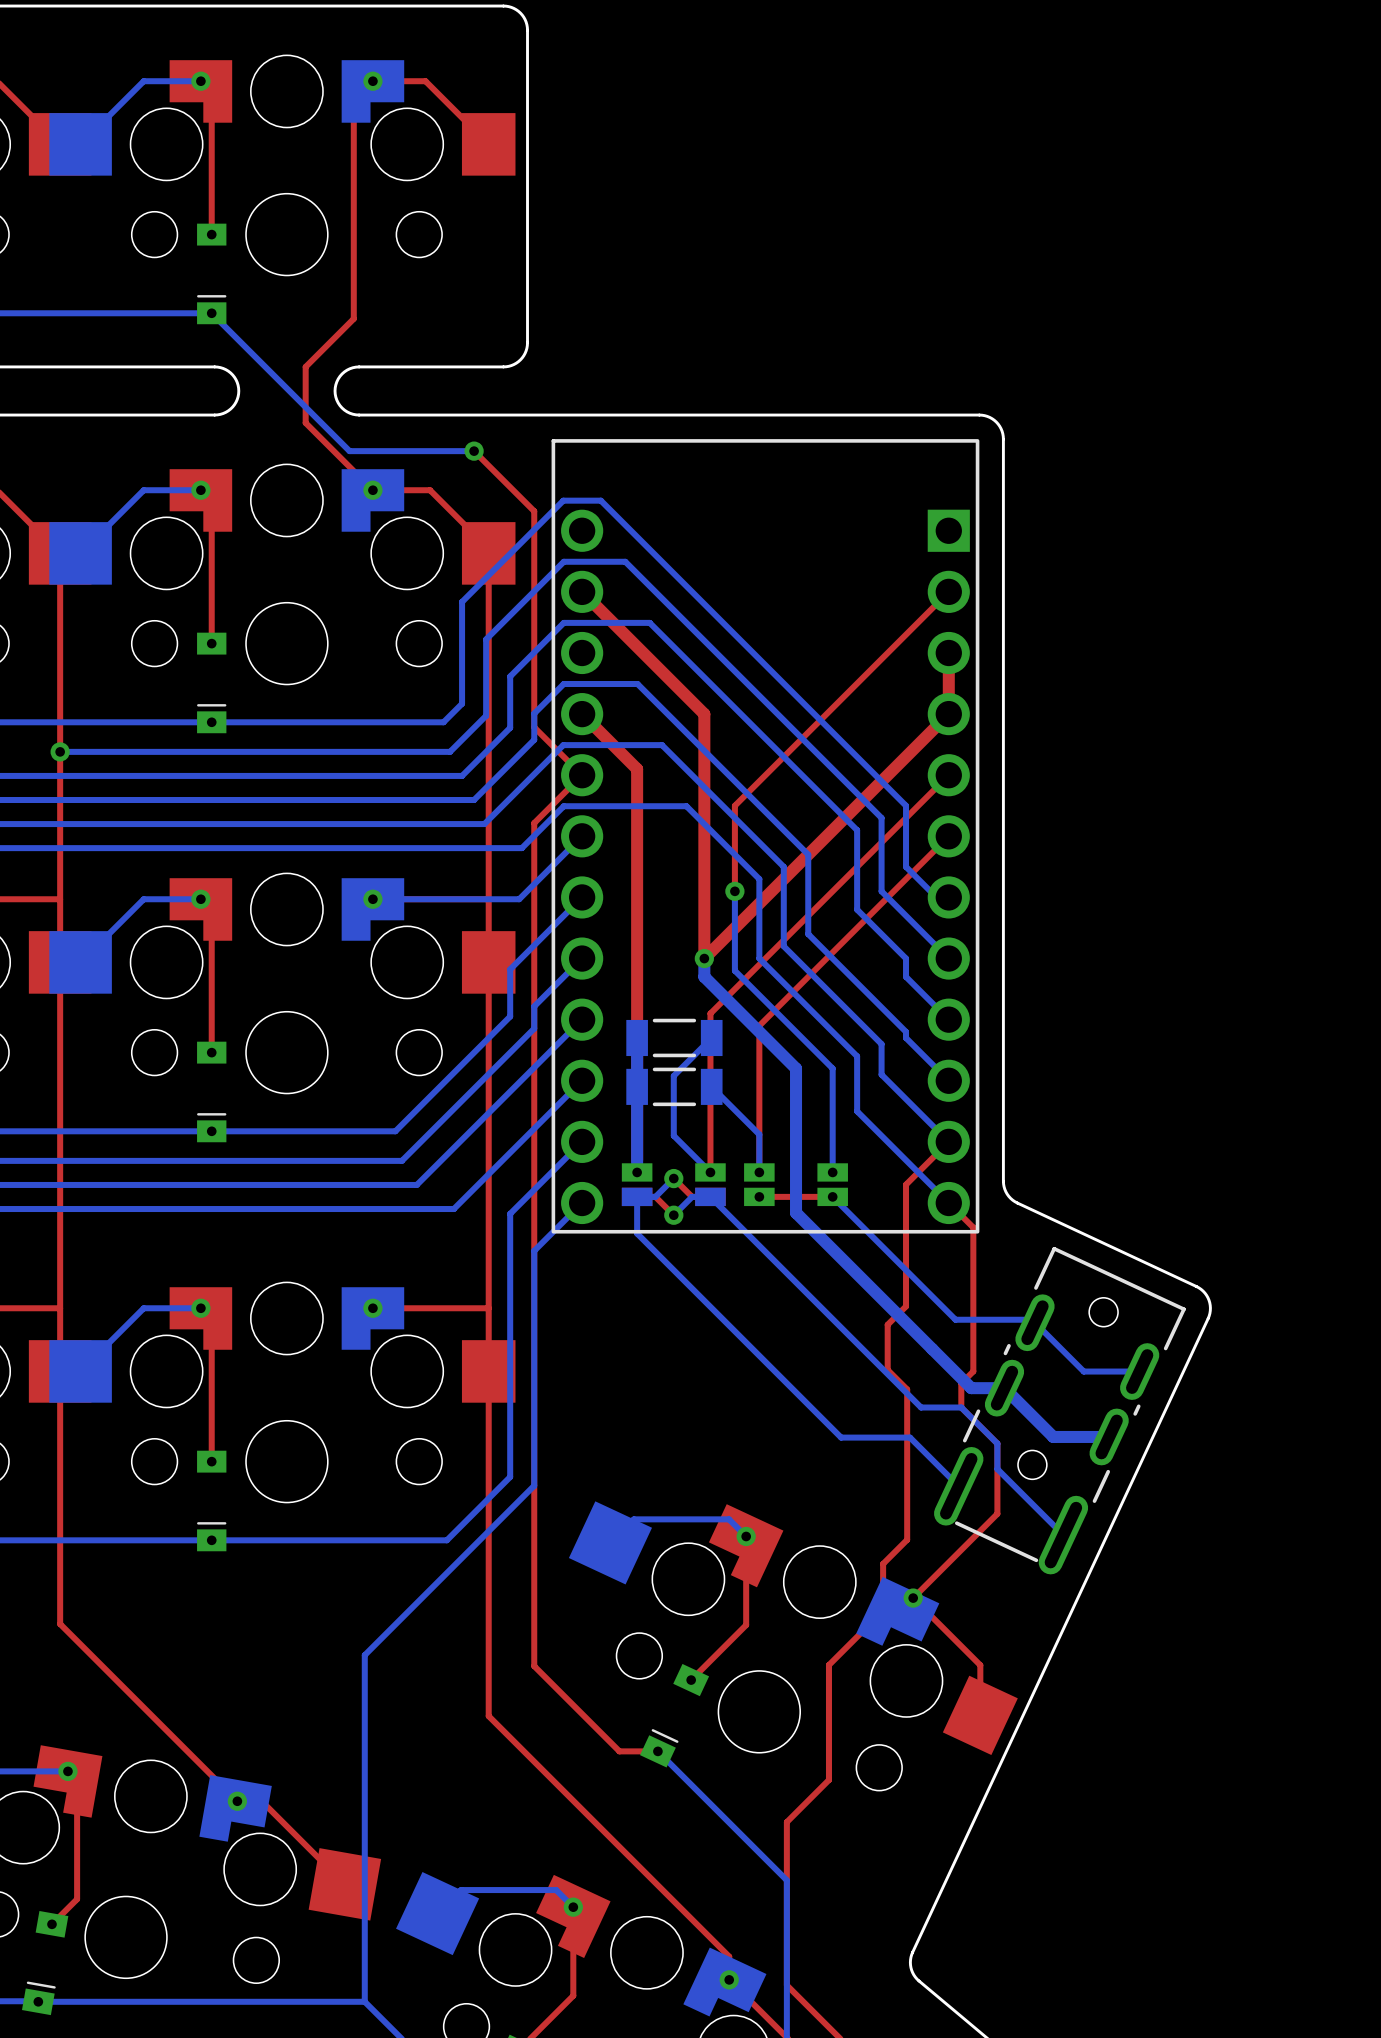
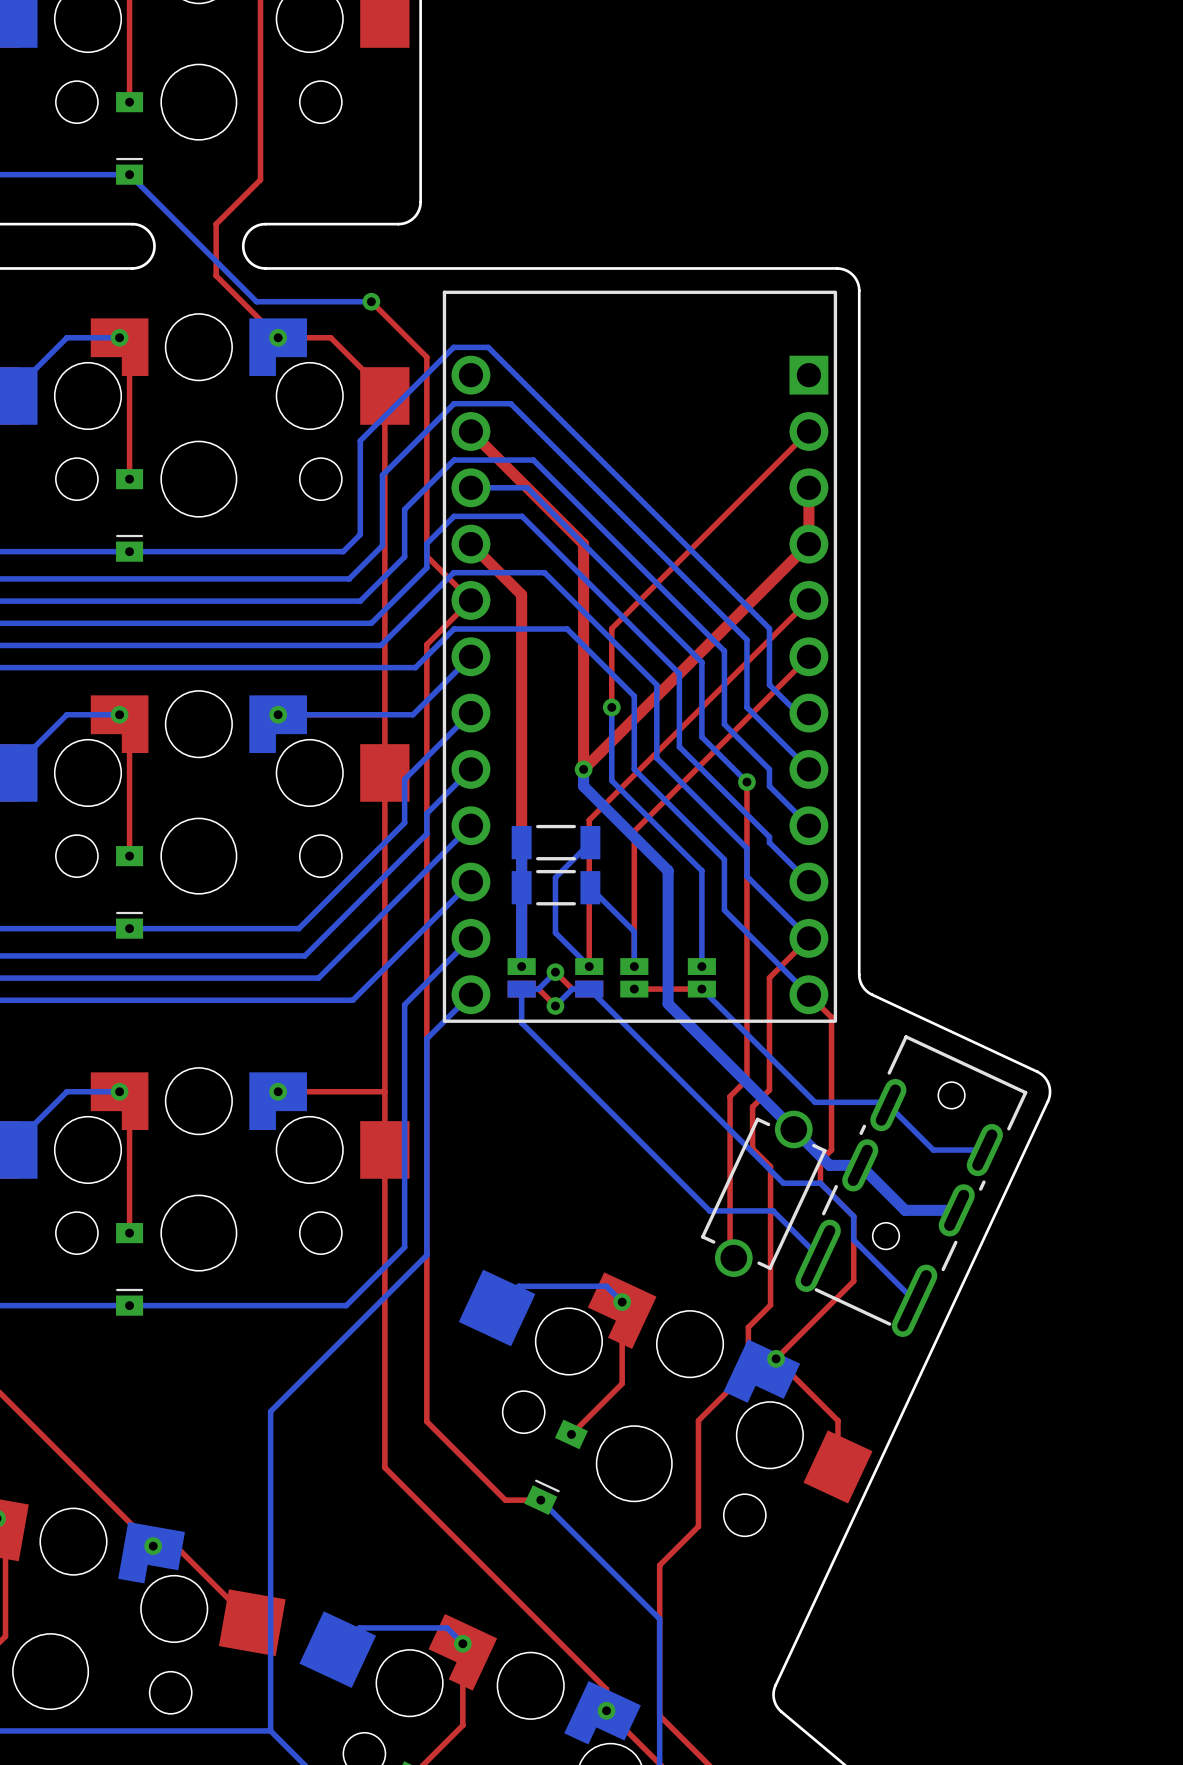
bottom track: none -> (470, 487) (527, 487) (701, 662) (701, 737) (746, 782)
top track: none -> (746, 782) (746, 1079) (730, 1096) (730, 1254) (733, 1258)
via: none -> (746, 782)
part: none -> (763, 1193)

